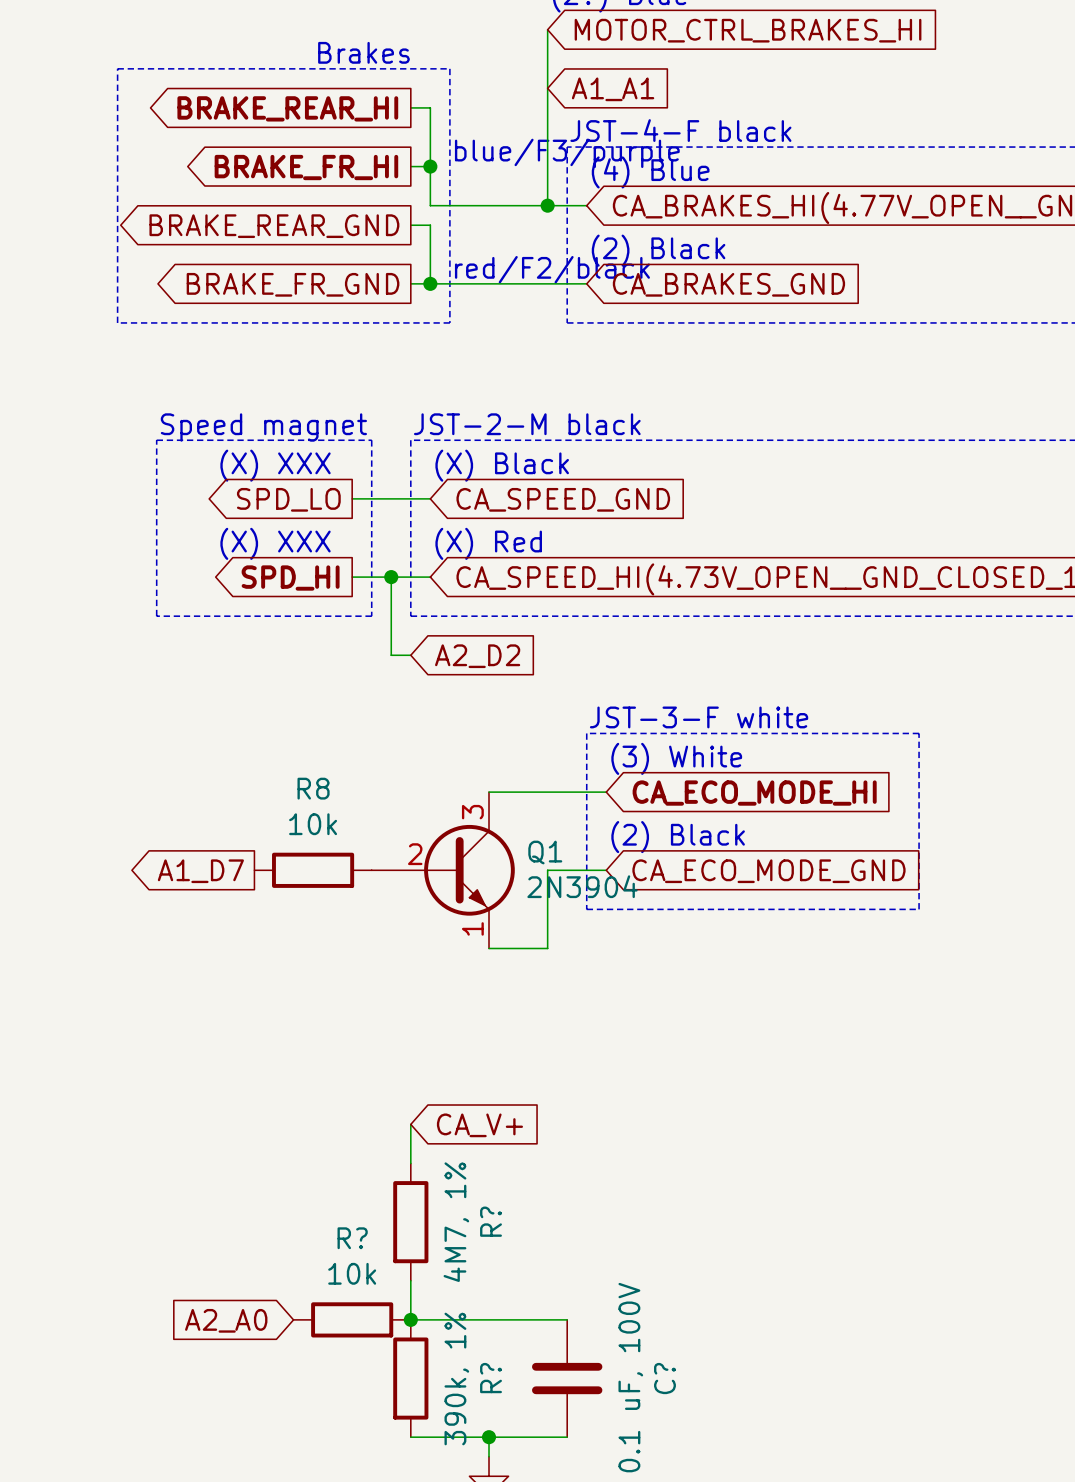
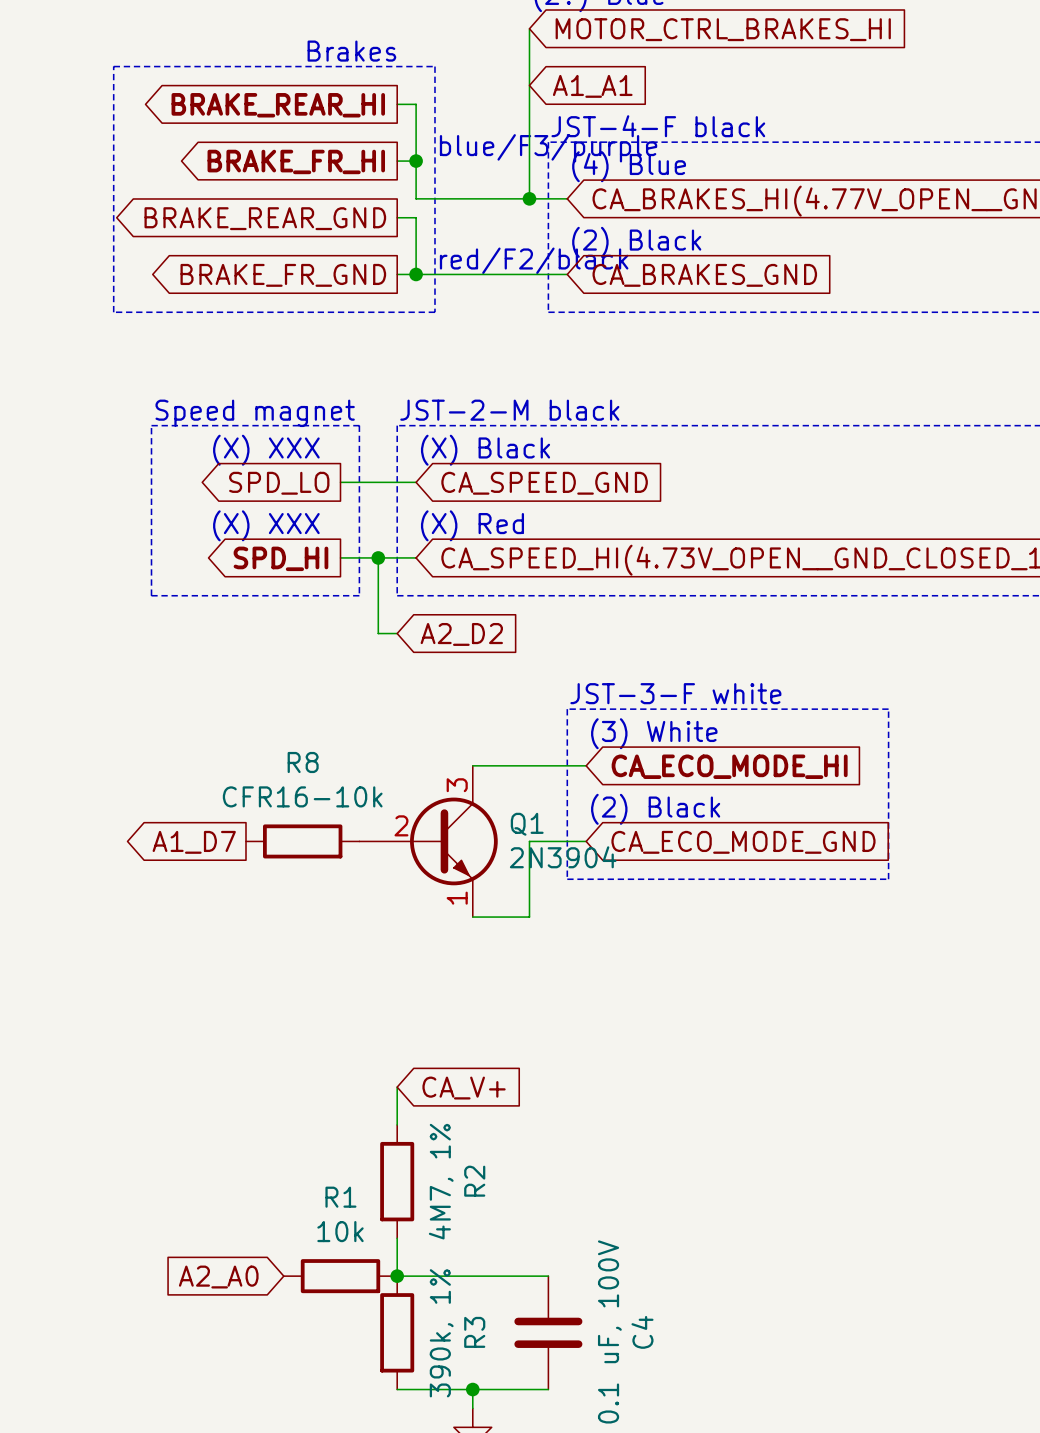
R8 value: 10k (313, 824) -> CFR16-10k (302, 796)
R? name: R? (491, 1221) -> R2 (474, 1181)
R? name: R? (352, 1238) -> R1 (340, 1197)
R? name: R? (491, 1378) -> R3 (474, 1332)
C? name: C? (664, 1378) -> C4 (642, 1332)

